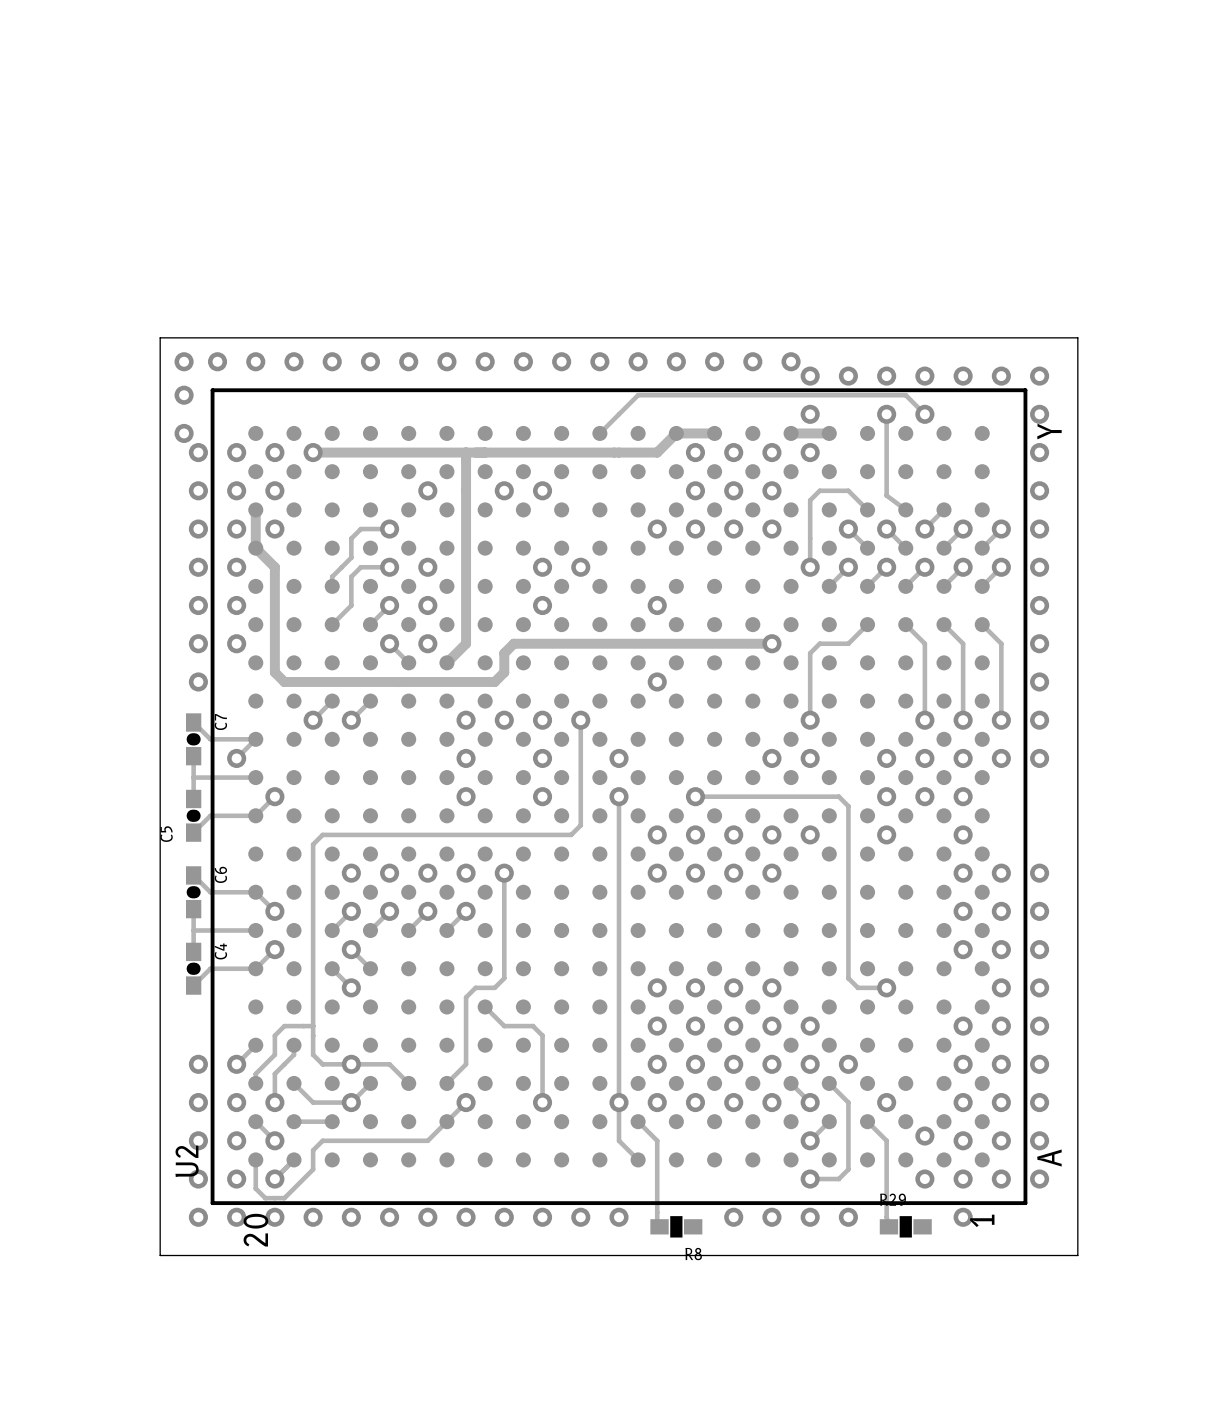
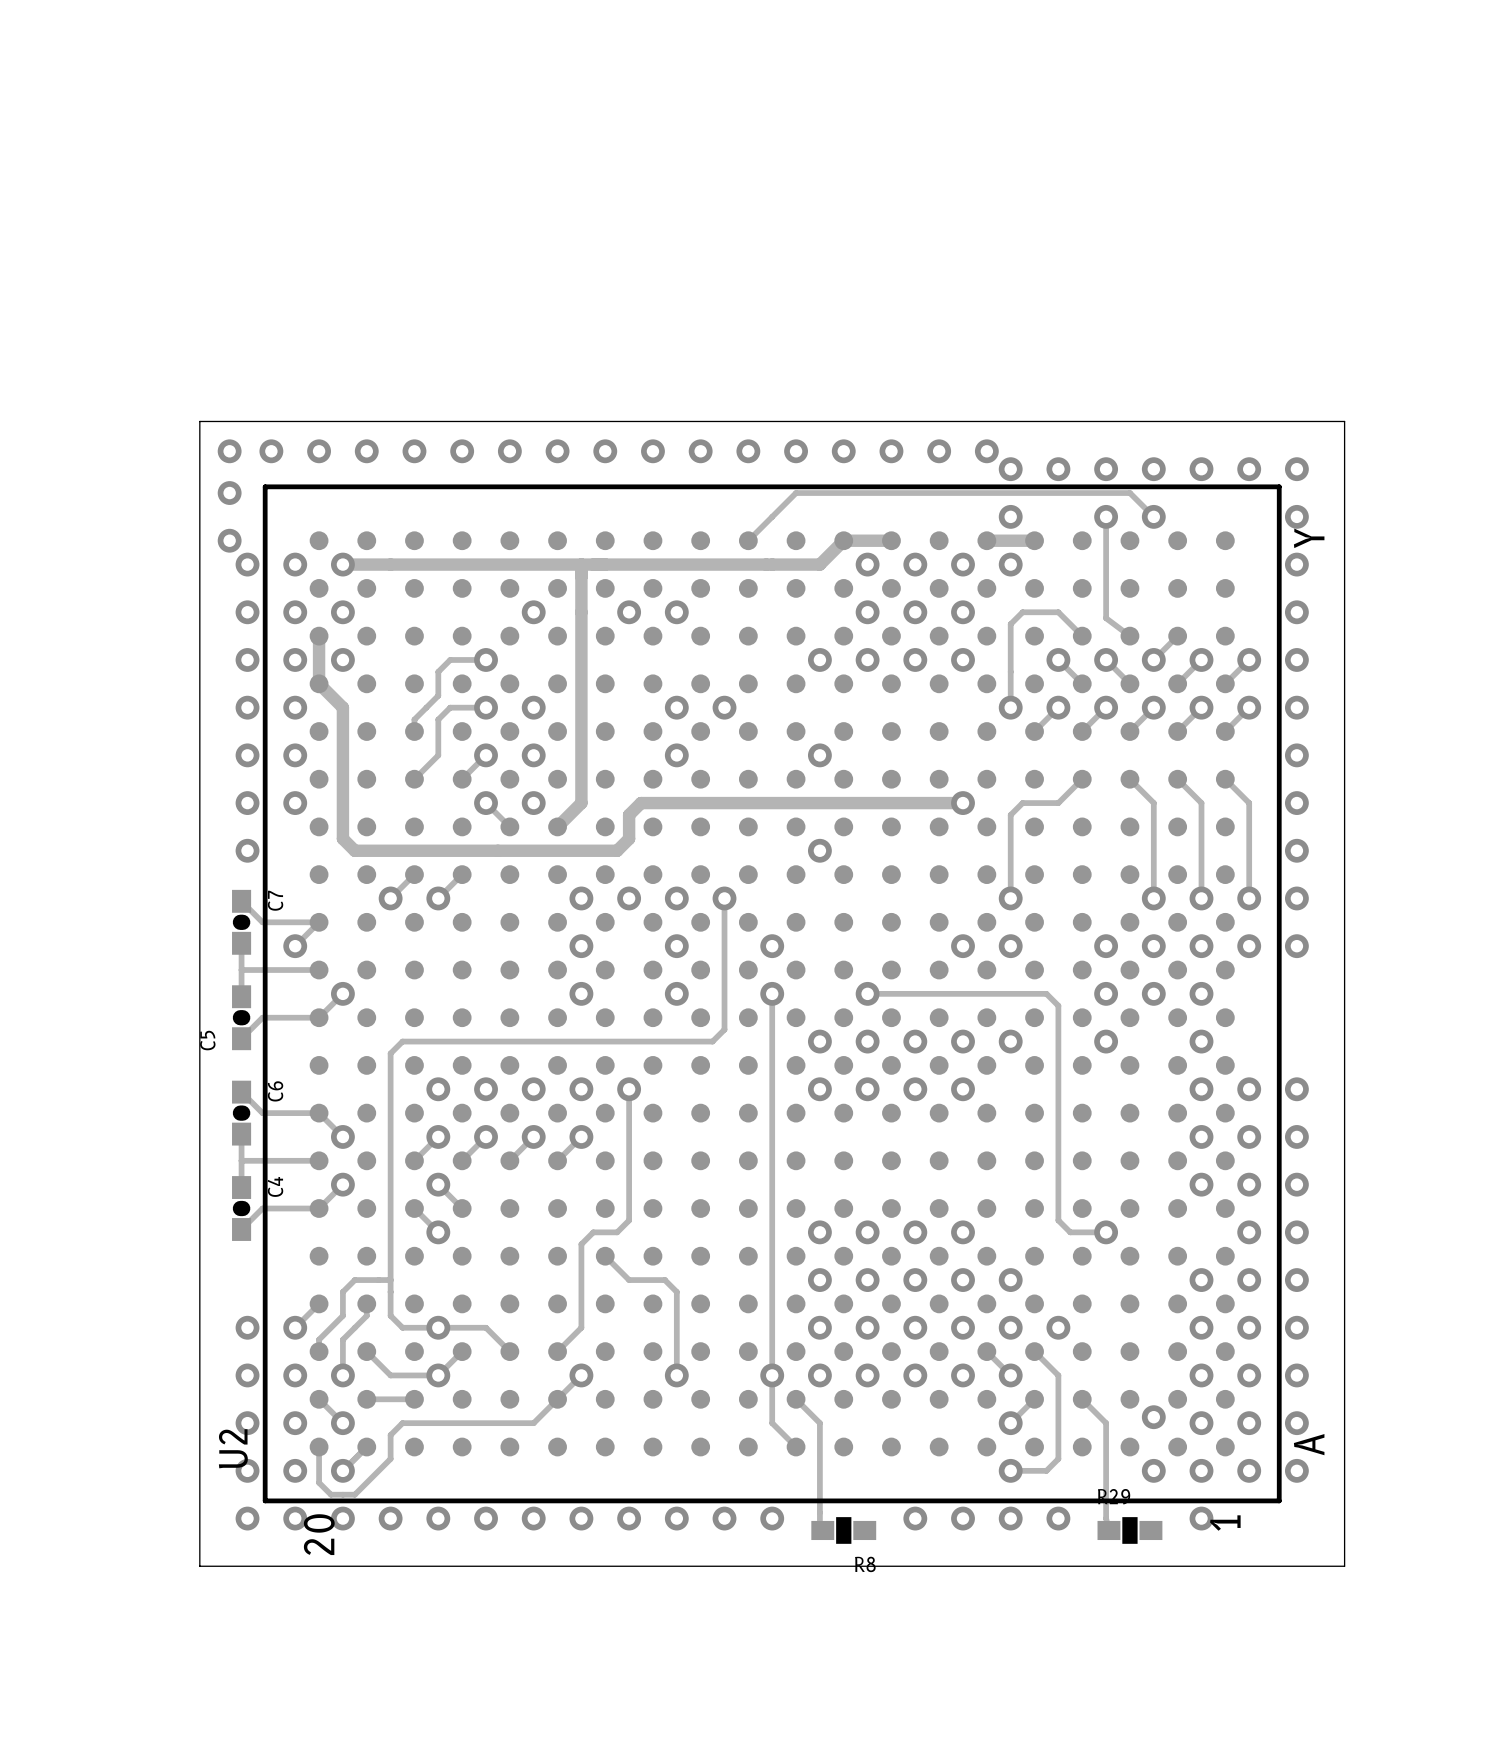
track: none -> (390, 564) (342, 564)
via: (313, 452) -> none
via: (886, 1102) -> none

